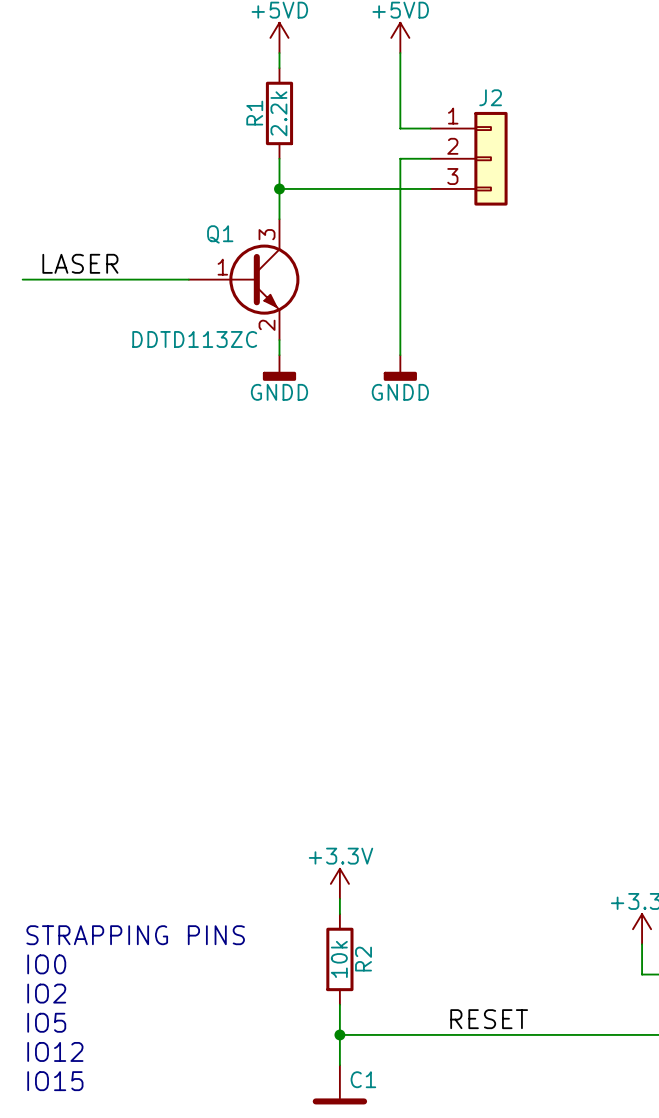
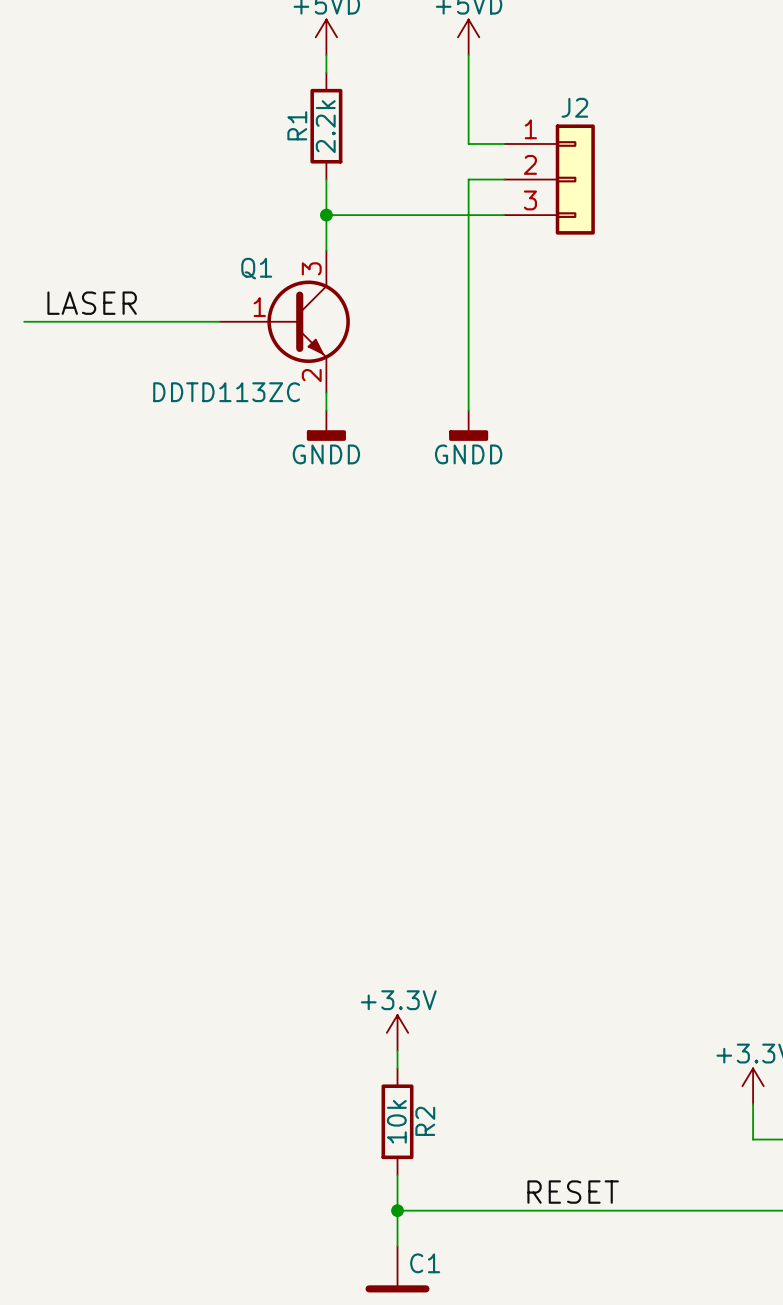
text: STRAPPING PINS (135, 935) -> none
text: IO0 (46, 964) -> none
text: IO2 (46, 993) -> none
text: IO5 (46, 1022) -> none
text: IO12 (55, 1051) -> none
text: IO15 (55, 1081) -> none

